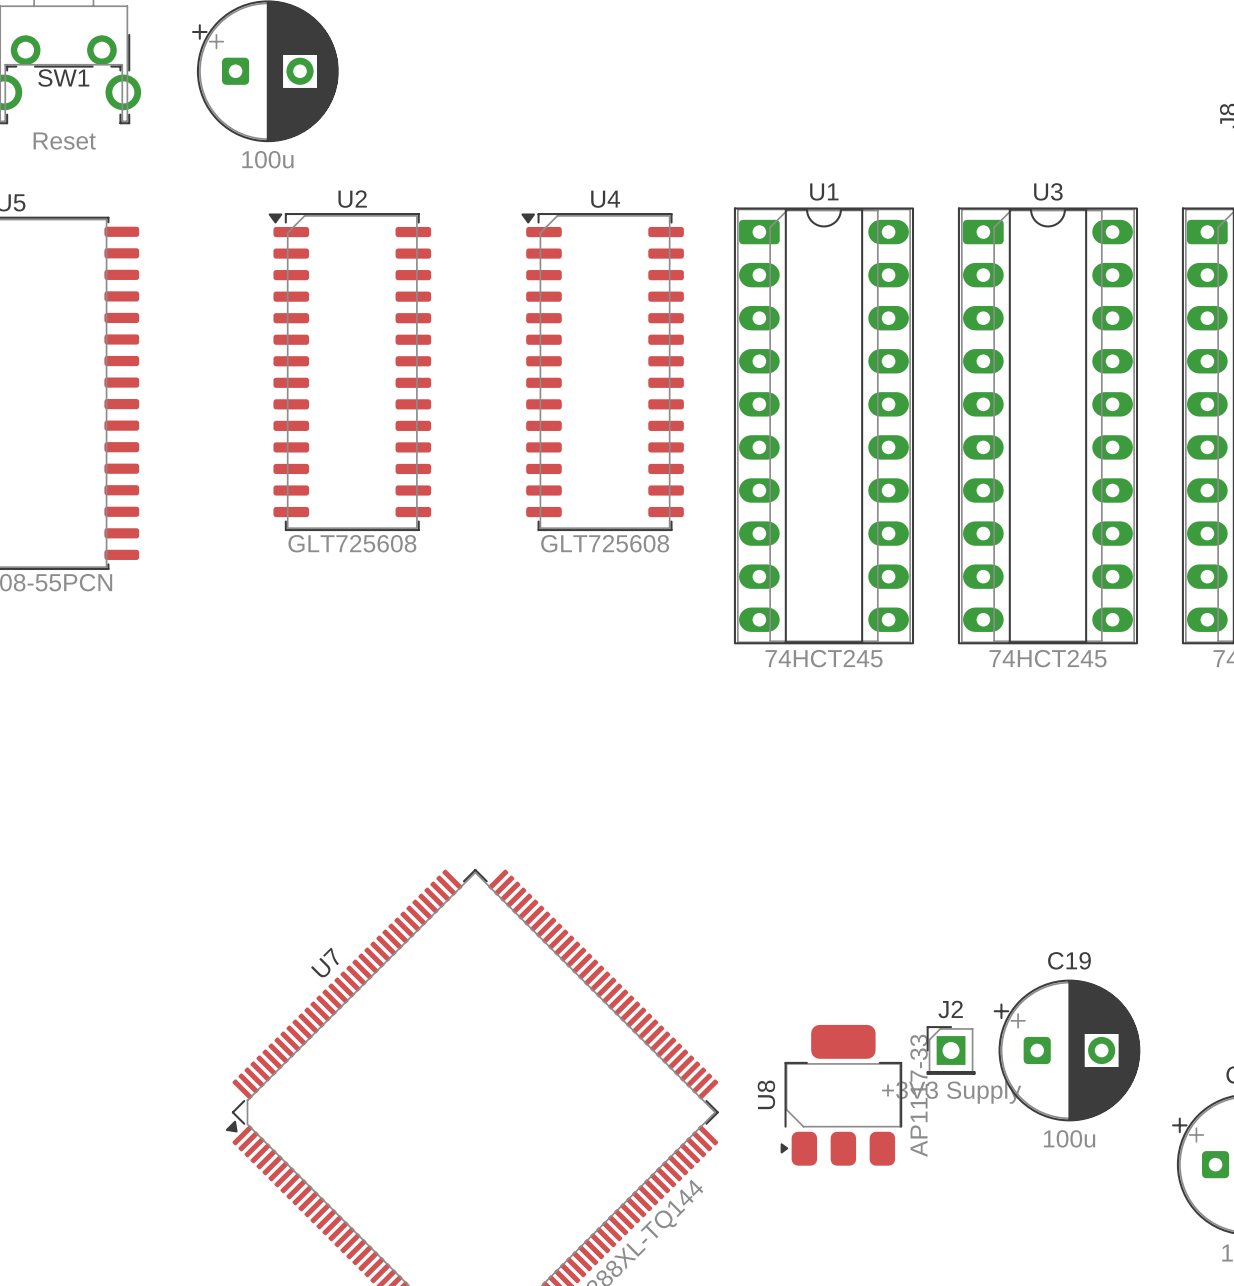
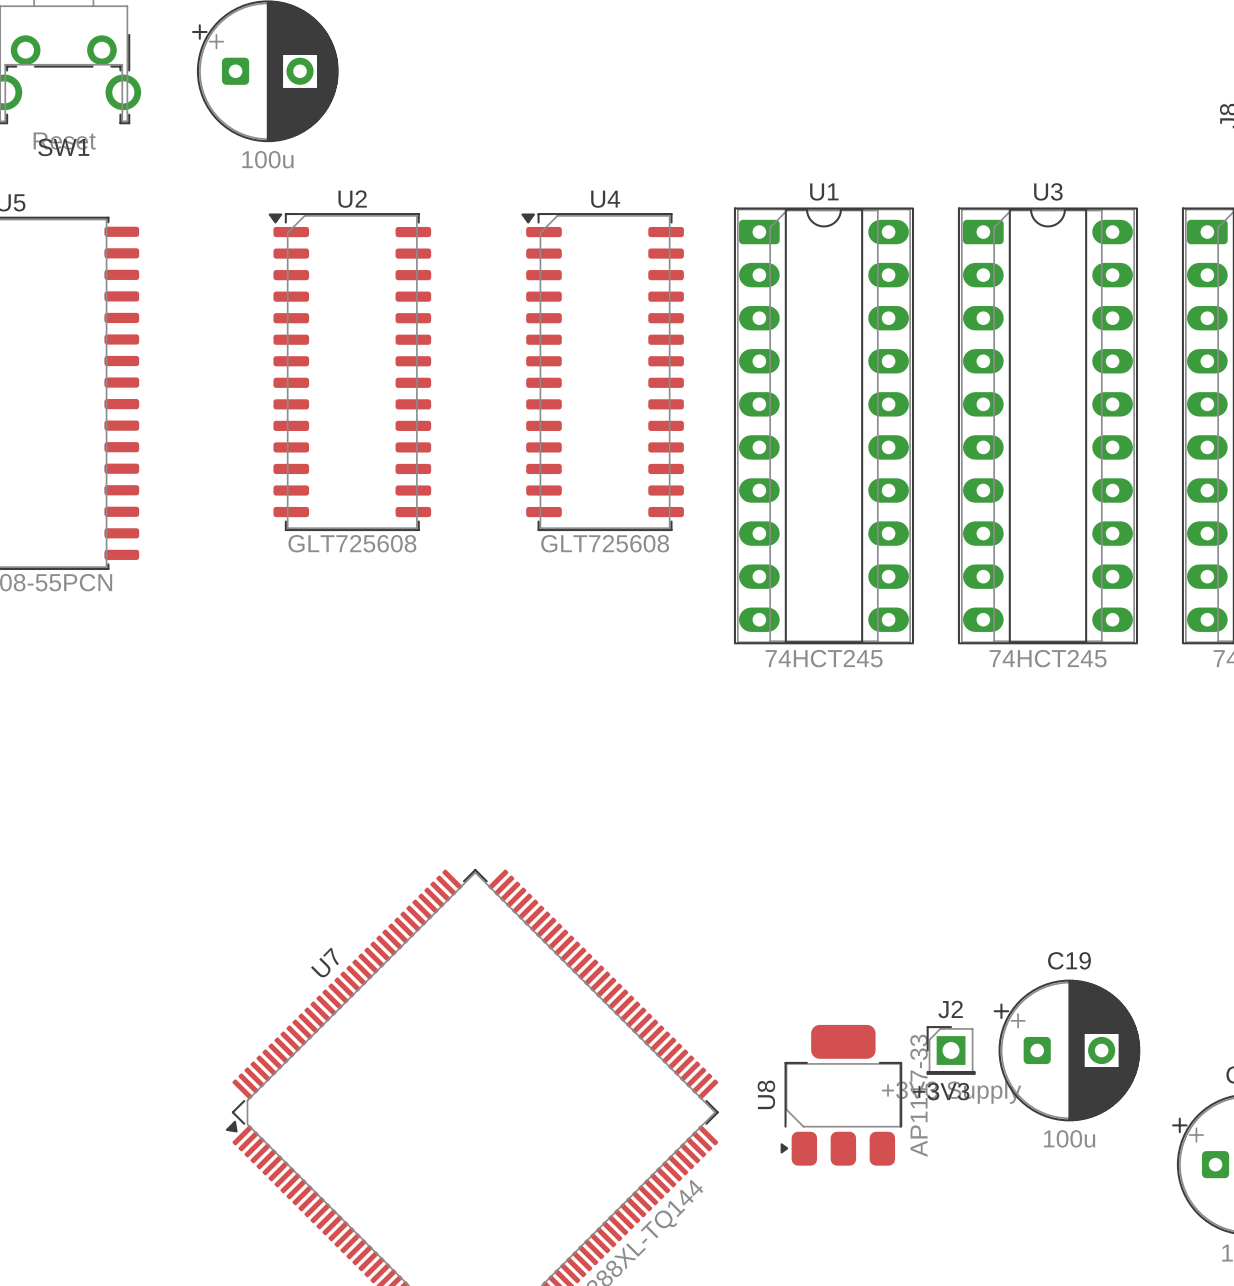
SW1 name position: SW1 (63, 78) -> SW1 (63, 147)
text: none -> +3V3 (941, 1091)

